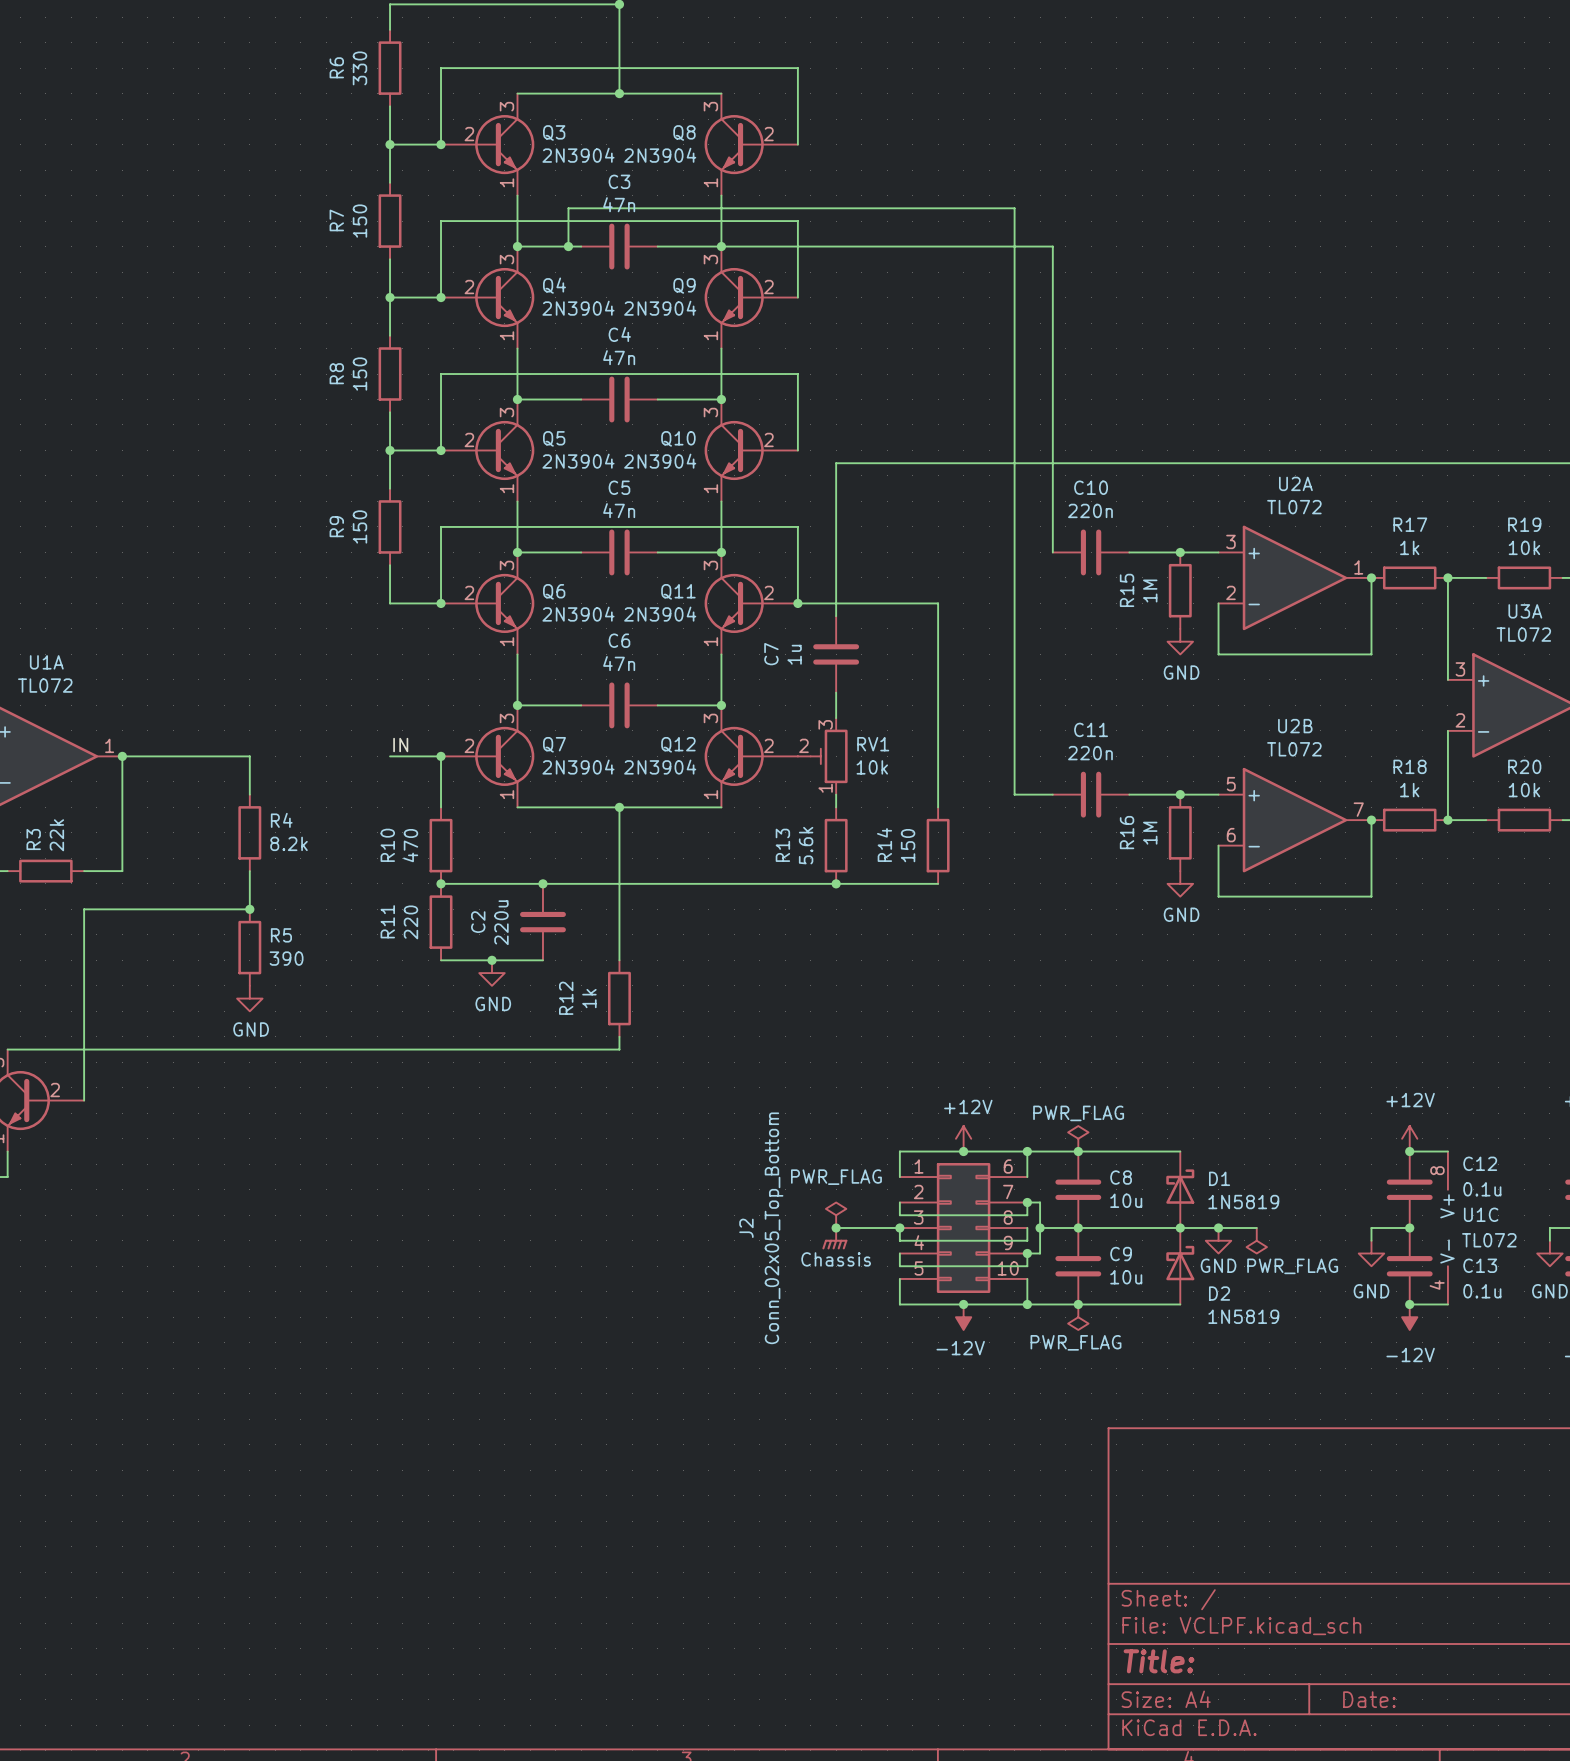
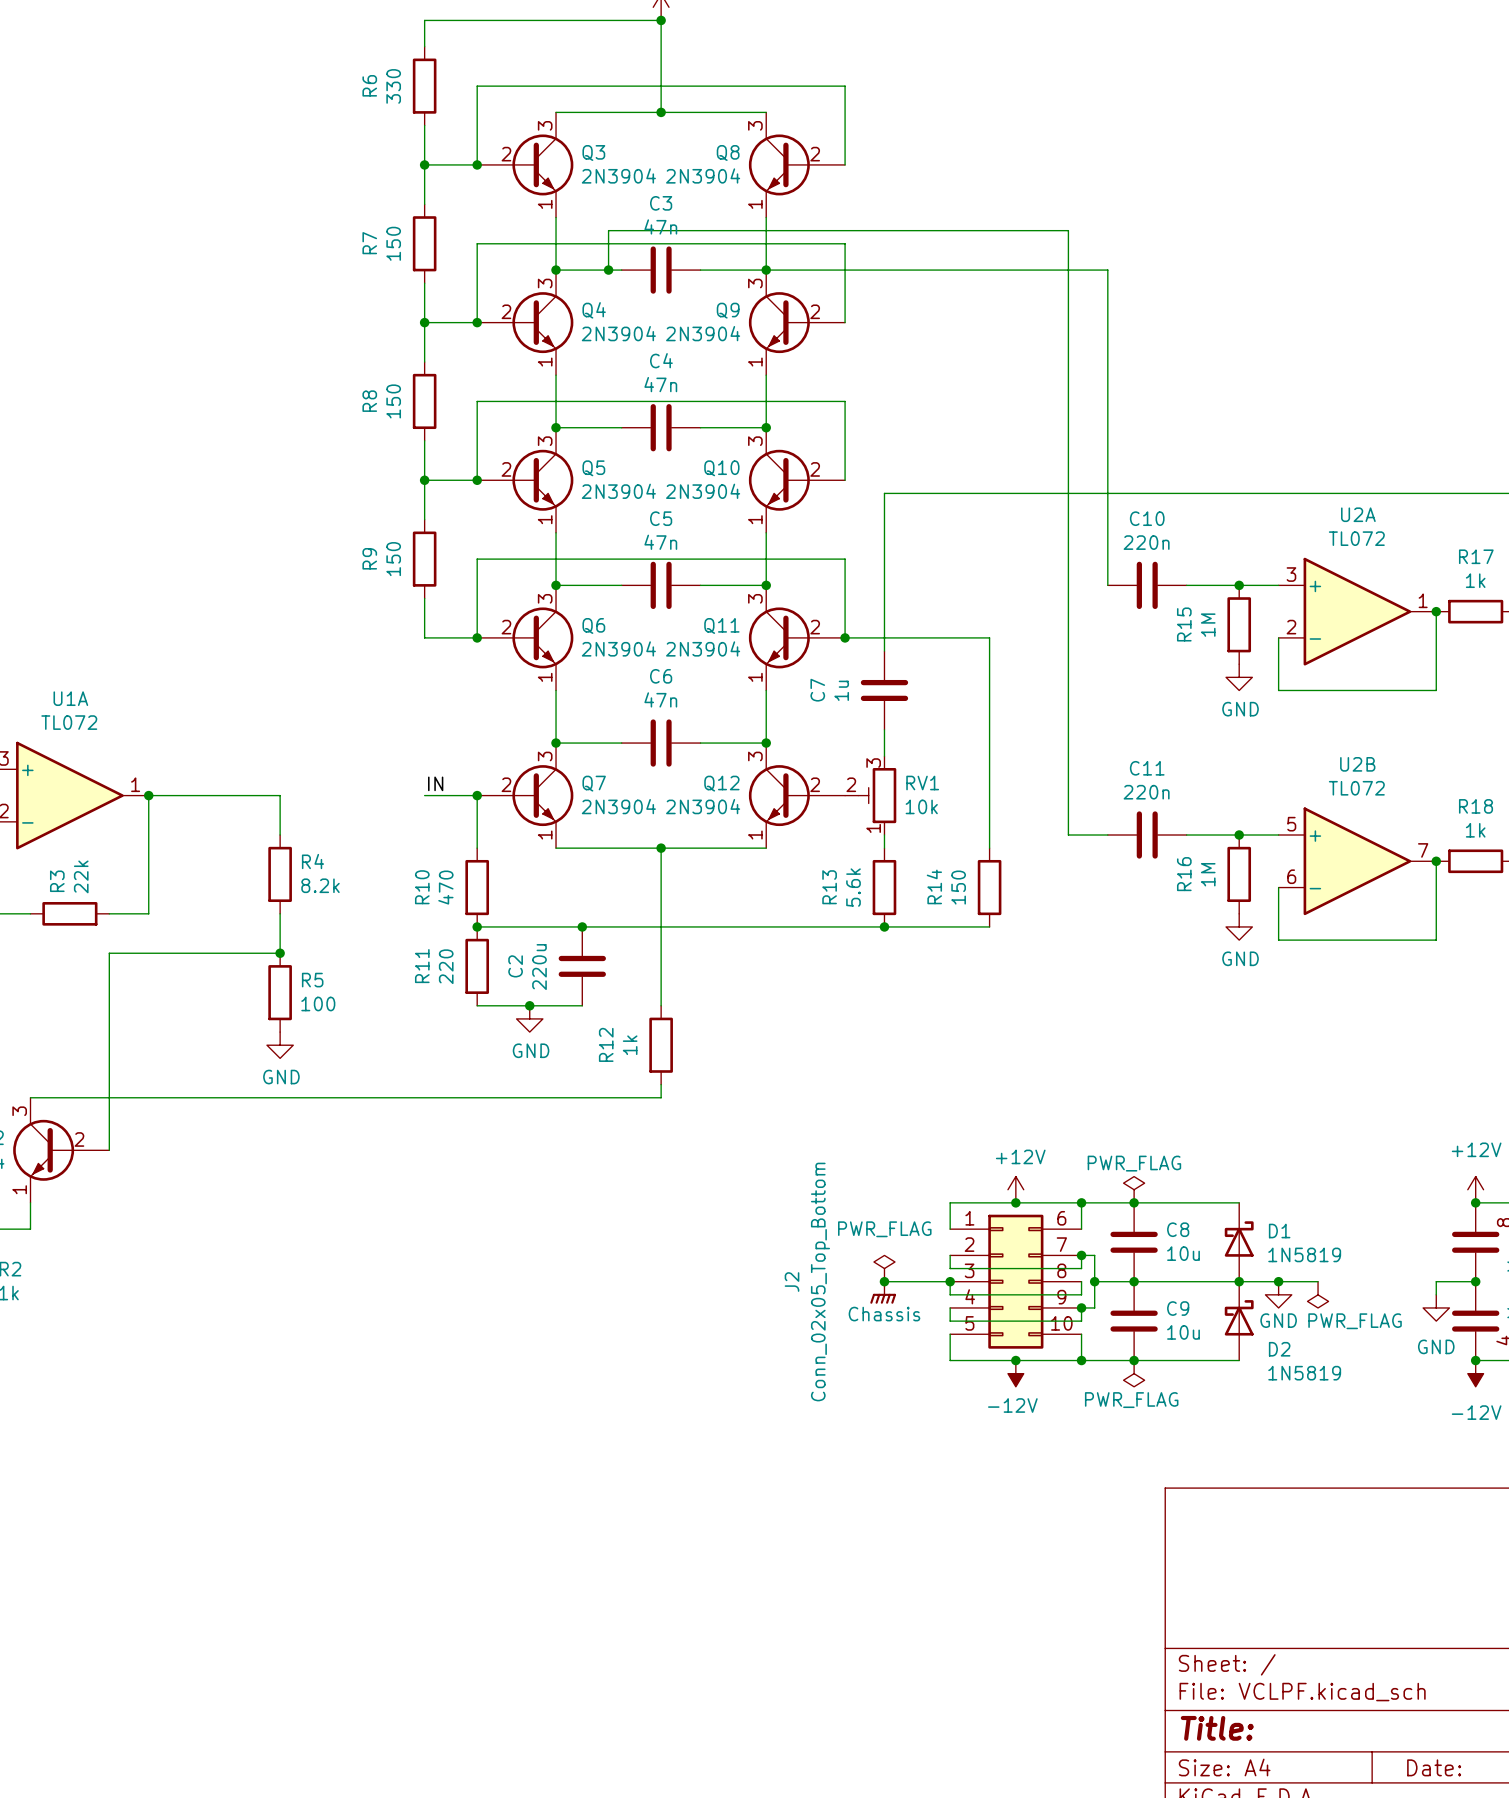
R5 value: 390 (286, 958) -> 100 (318, 1003)

